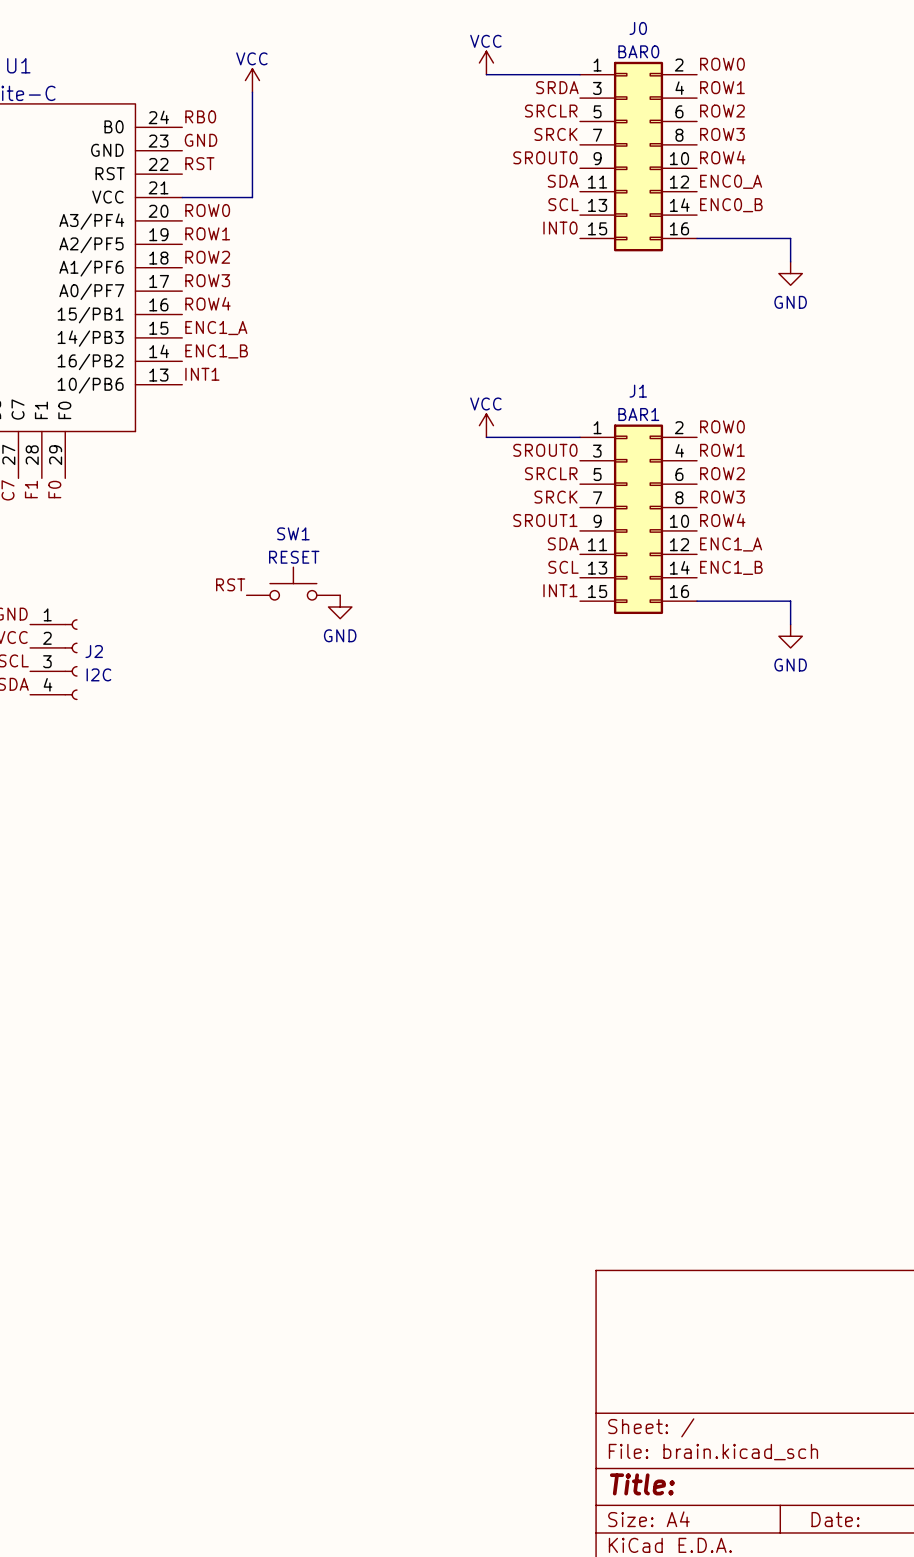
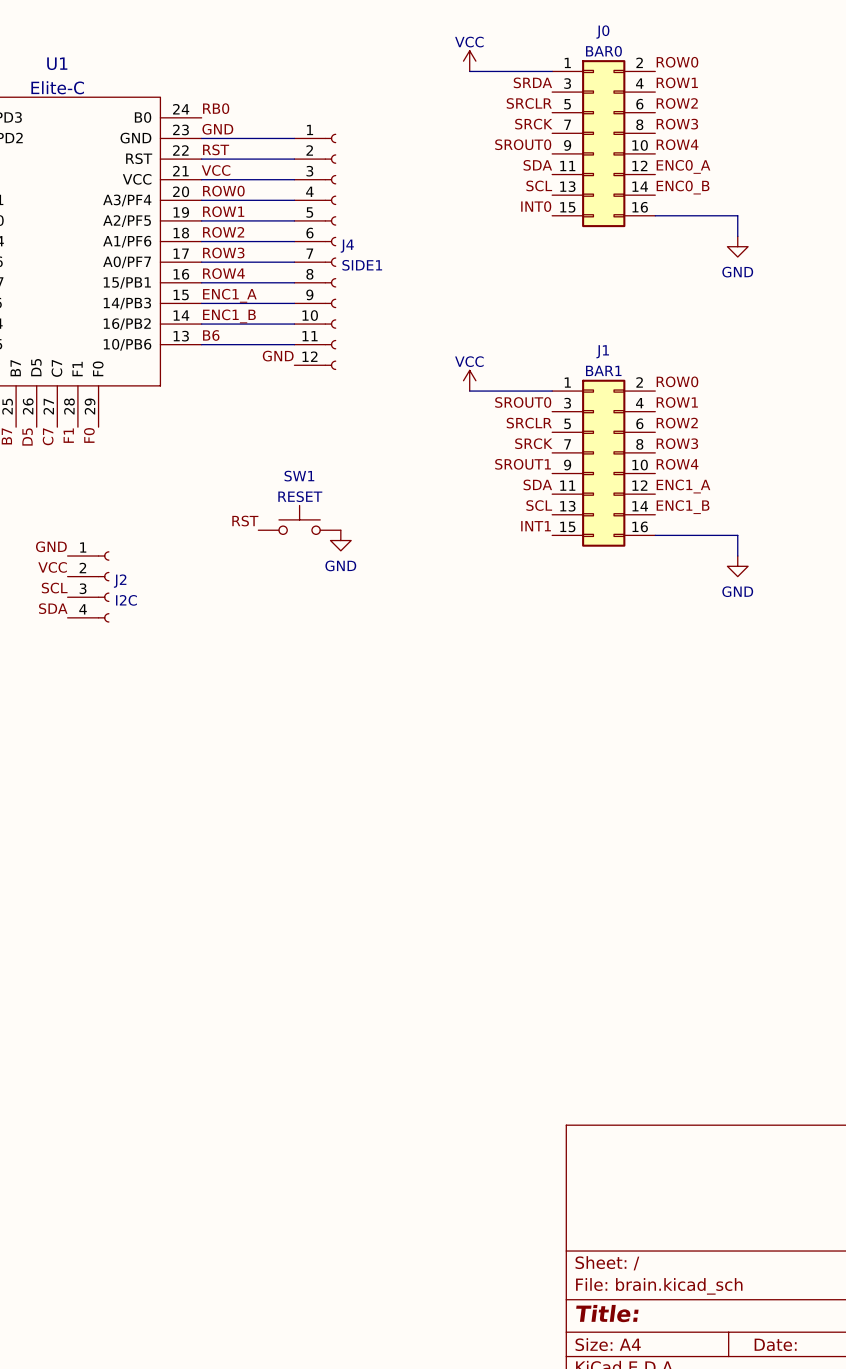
power symbol: VCC (252, 80) -> none
wire: (252, 92) (252, 197) -> (294, 179) (263, 179)
wire: none -> (201, 138) (294, 138)
wire: none -> (201, 159) (294, 159)
label: none -> VCC (216, 170)
wire: none -> (201, 200) (294, 200)
wire: none -> (201, 220) (294, 220)
wire: none -> (201, 241) (294, 241)
J4: none -> SIDE1 (315, 251)
wire: none -> (201, 262) (294, 262)
wire: none -> (201, 282) (294, 282)
wire: none -> (201, 303) (294, 303)
wire: none -> (201, 324) (294, 324)
label: INT1 (202, 374) -> B6 (211, 335)
wire: none -> (201, 344) (294, 344)
label: none -> GND (278, 356)

